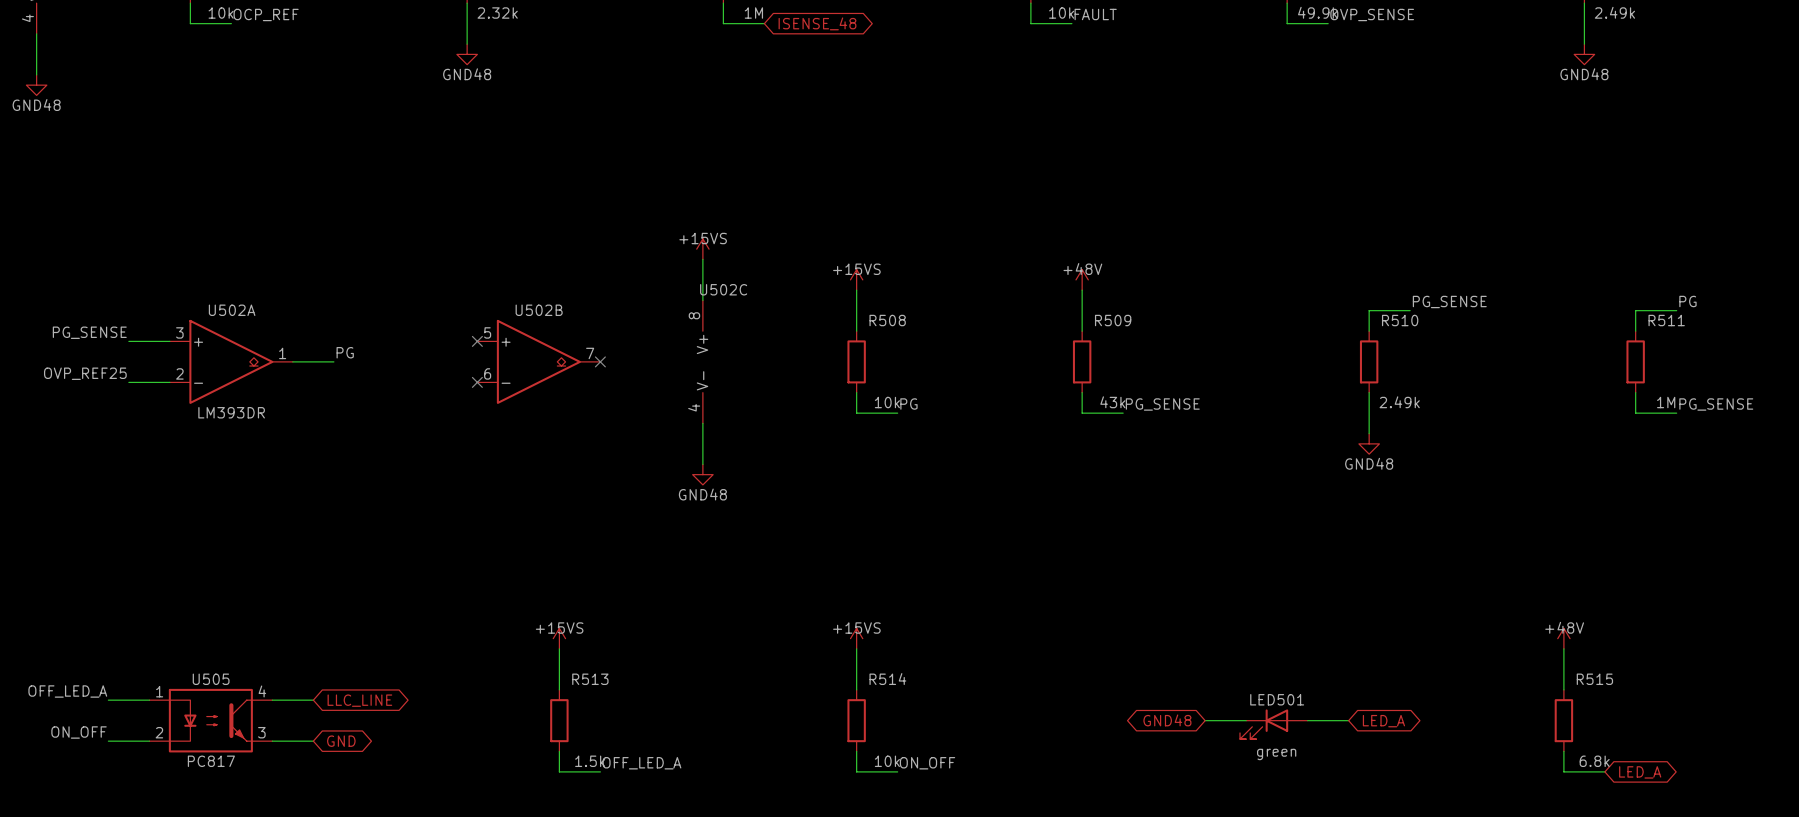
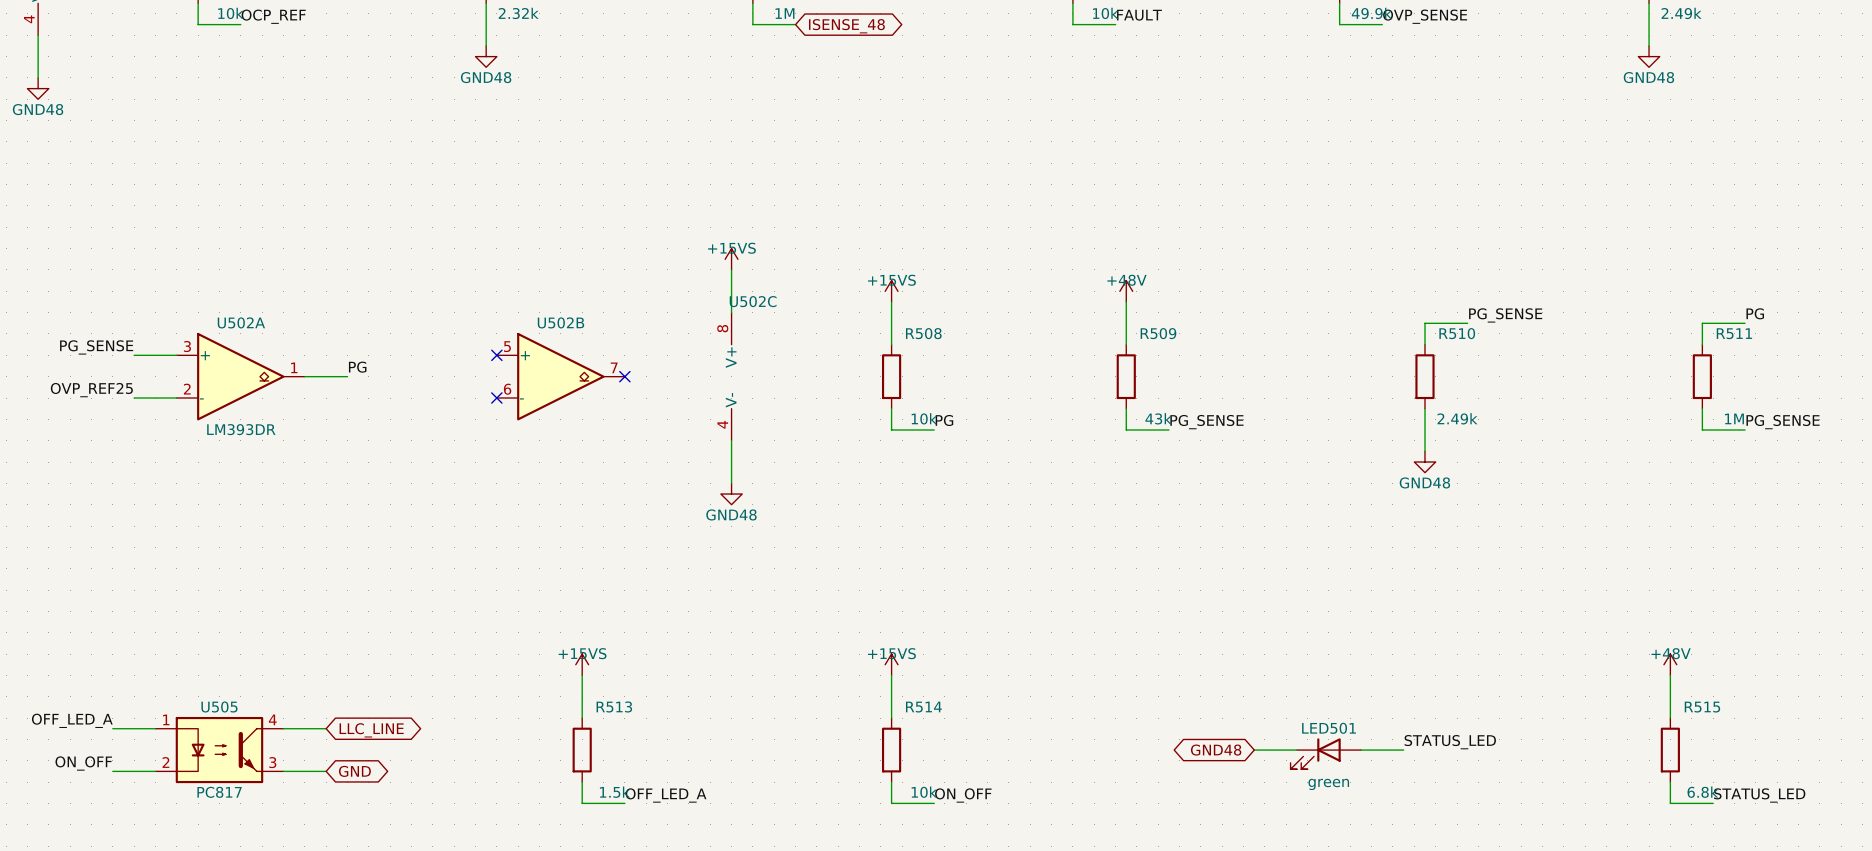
power symbol position: +48V (1563, 638) -> +48V (1670, 664)
wire: (1563, 648) (1563, 689) -> (1670, 675) (1670, 718)
label: none -> STATUS_LED (1450, 742)
R515 position: (1563, 720) -> (1670, 750)
global label: LED_A (1383, 721) -> none
wire: (1563, 751) (1563, 771) (1604, 771) -> (1670, 782) (1670, 803) (1713, 803)
label: none -> STATUS_LED (1759, 795)
global label: LED_A (1640, 772) -> none

